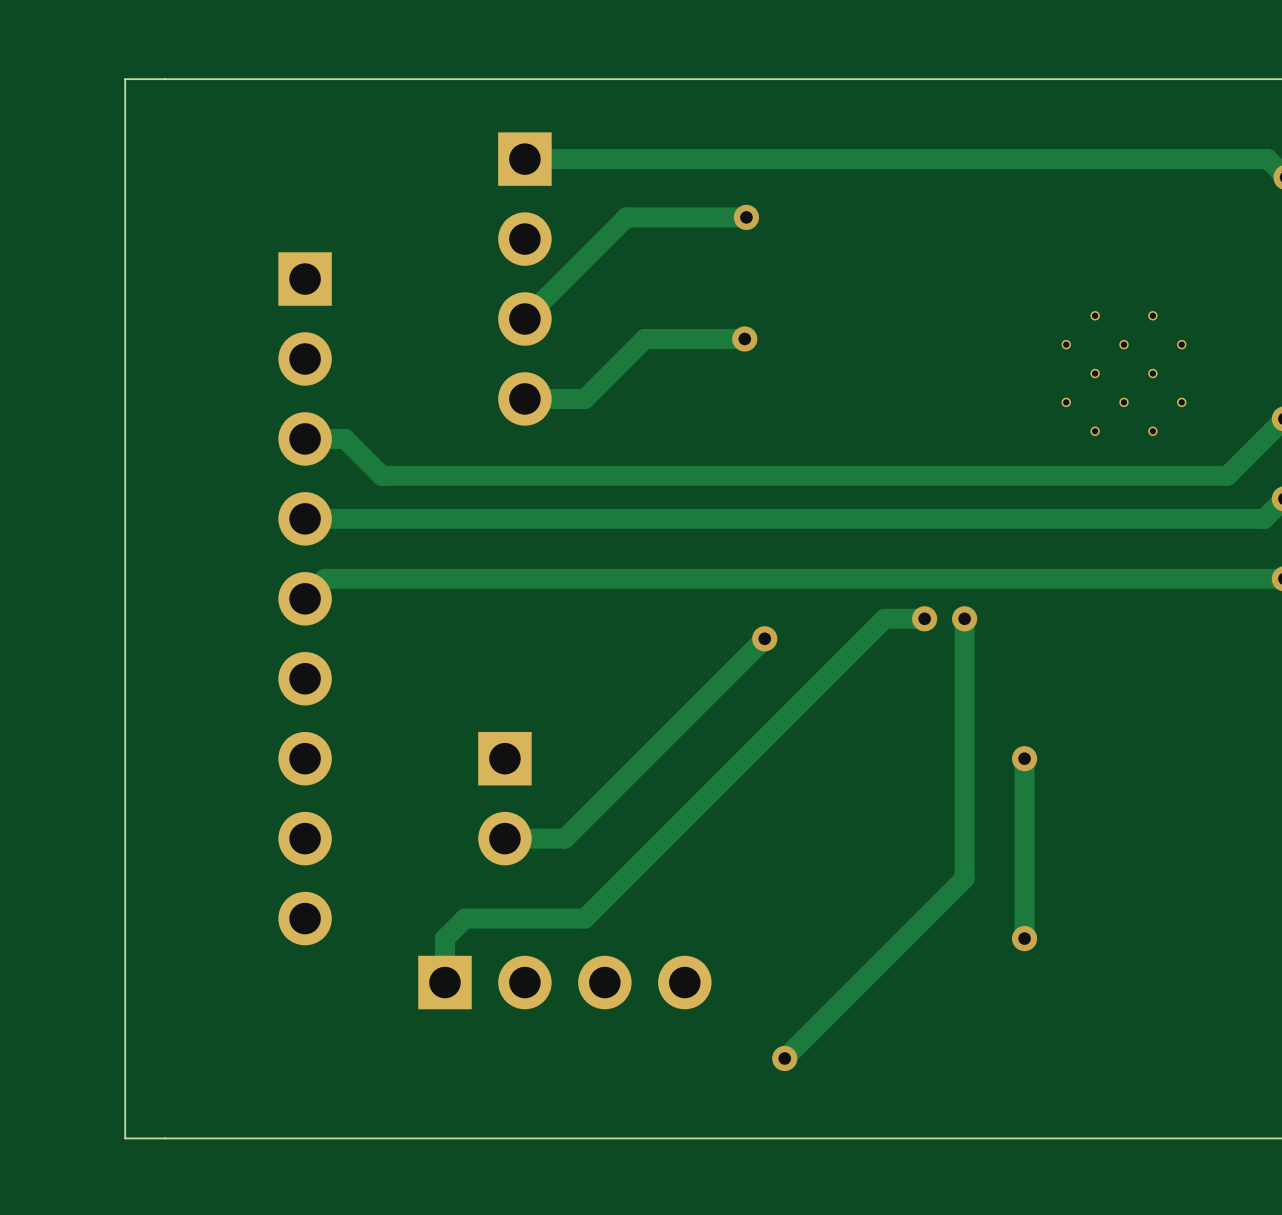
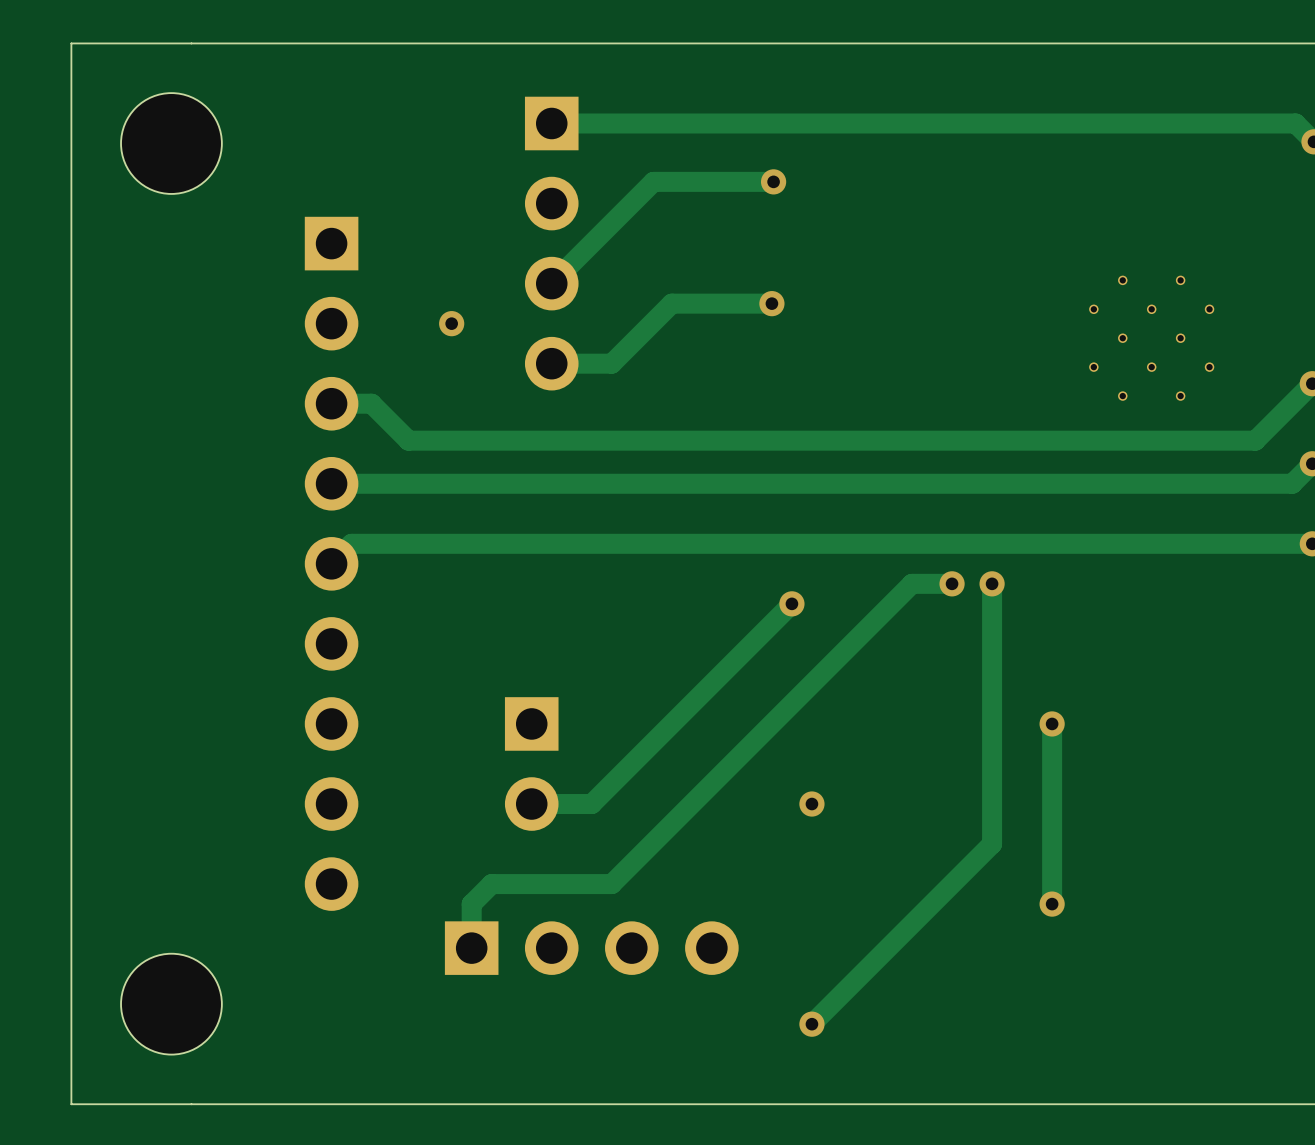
board edge: (125, 79) (125, 1138) -> (151, 43) (71, 43) (71, 1104) (151, 1104)
part: none -> (171, 143)
via: none -> (451, 323)
via: none -> (811, 804)
part: none -> (171, 1004)

